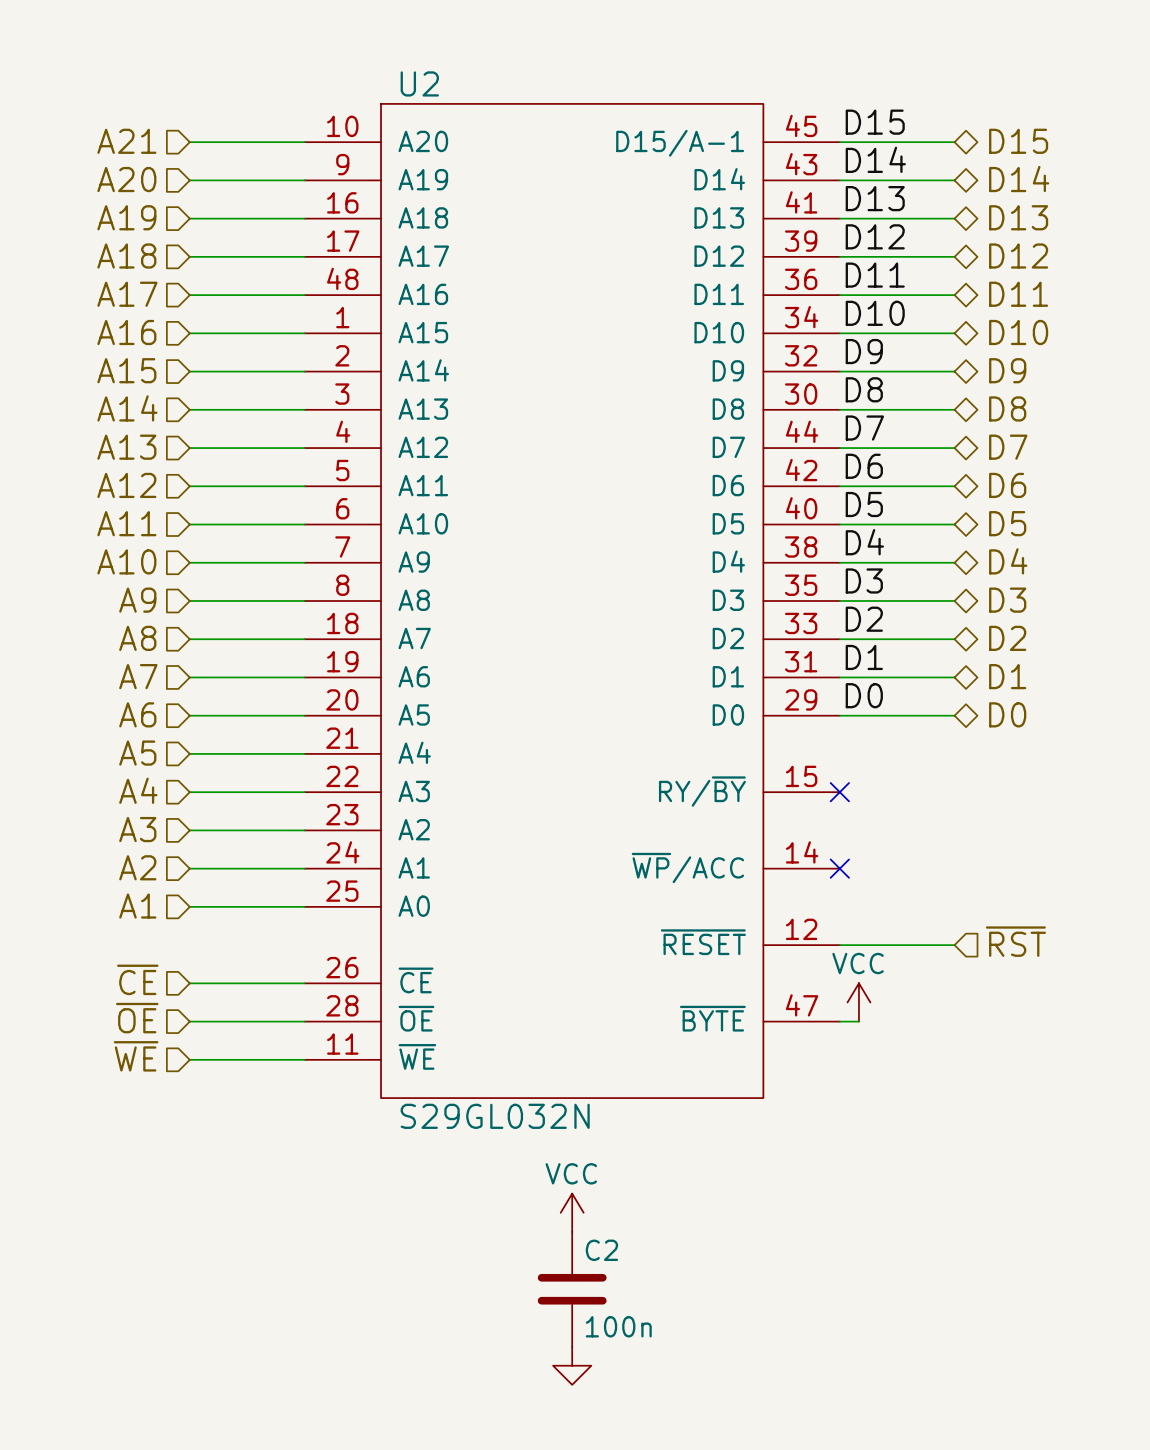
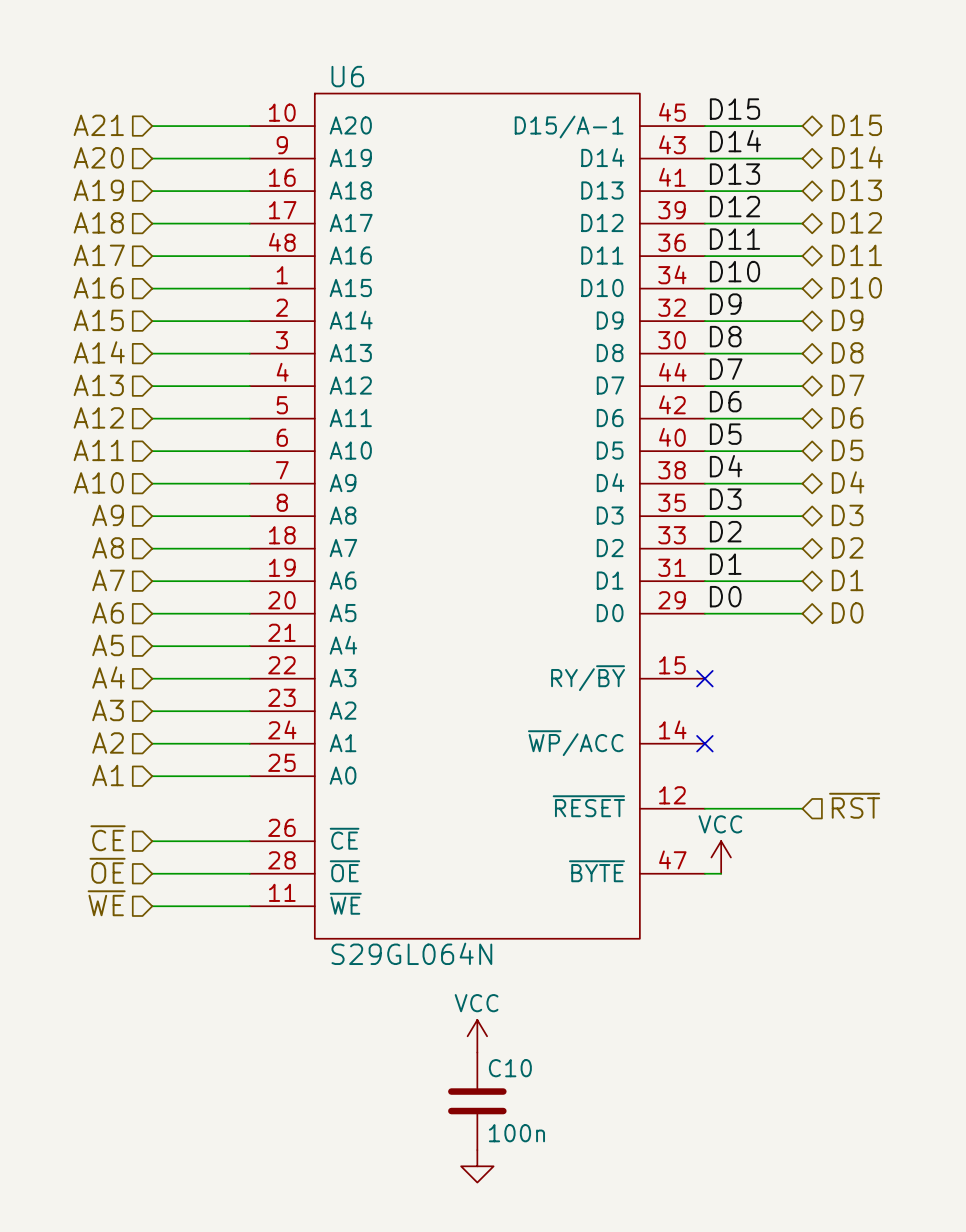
U2 name: U2 (419, 83) -> U6 (347, 76)
U2 value: S29GL032N (495, 1116) -> S29GL064N (411, 953)
C2 name: C2 (601, 1250) -> C10 (510, 1068)

